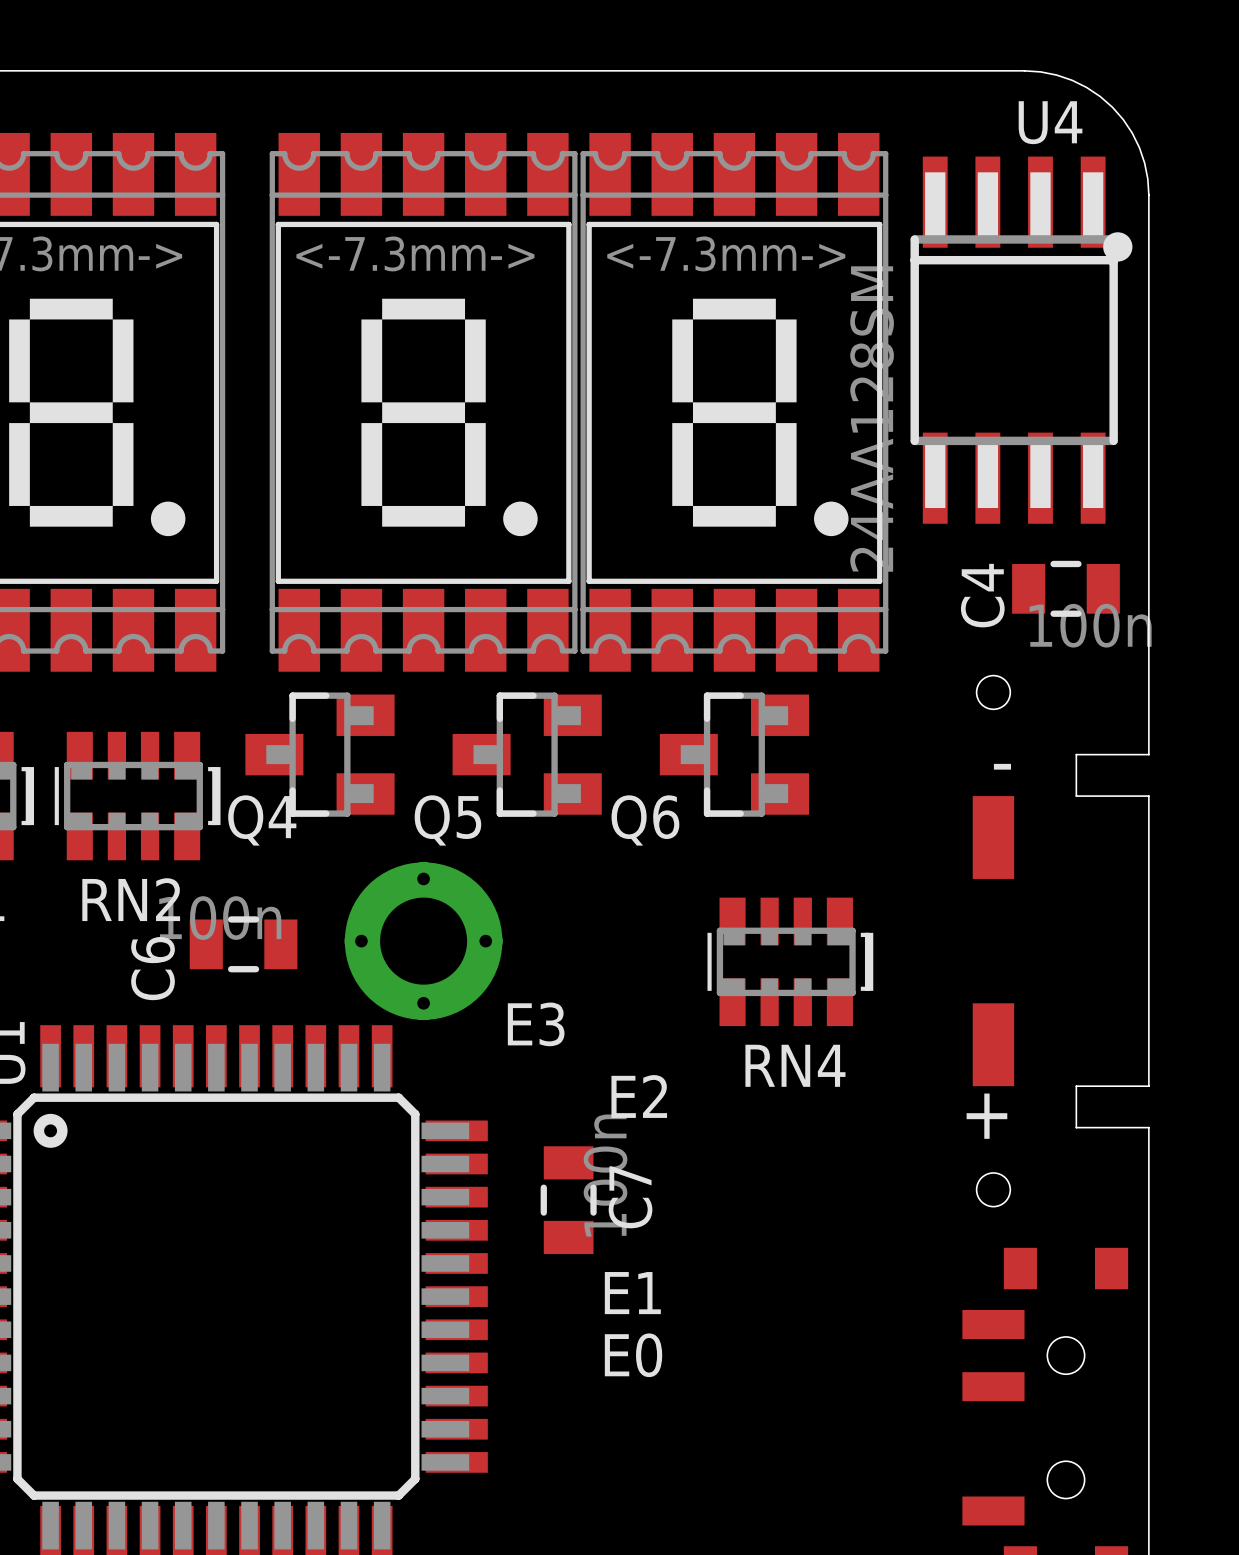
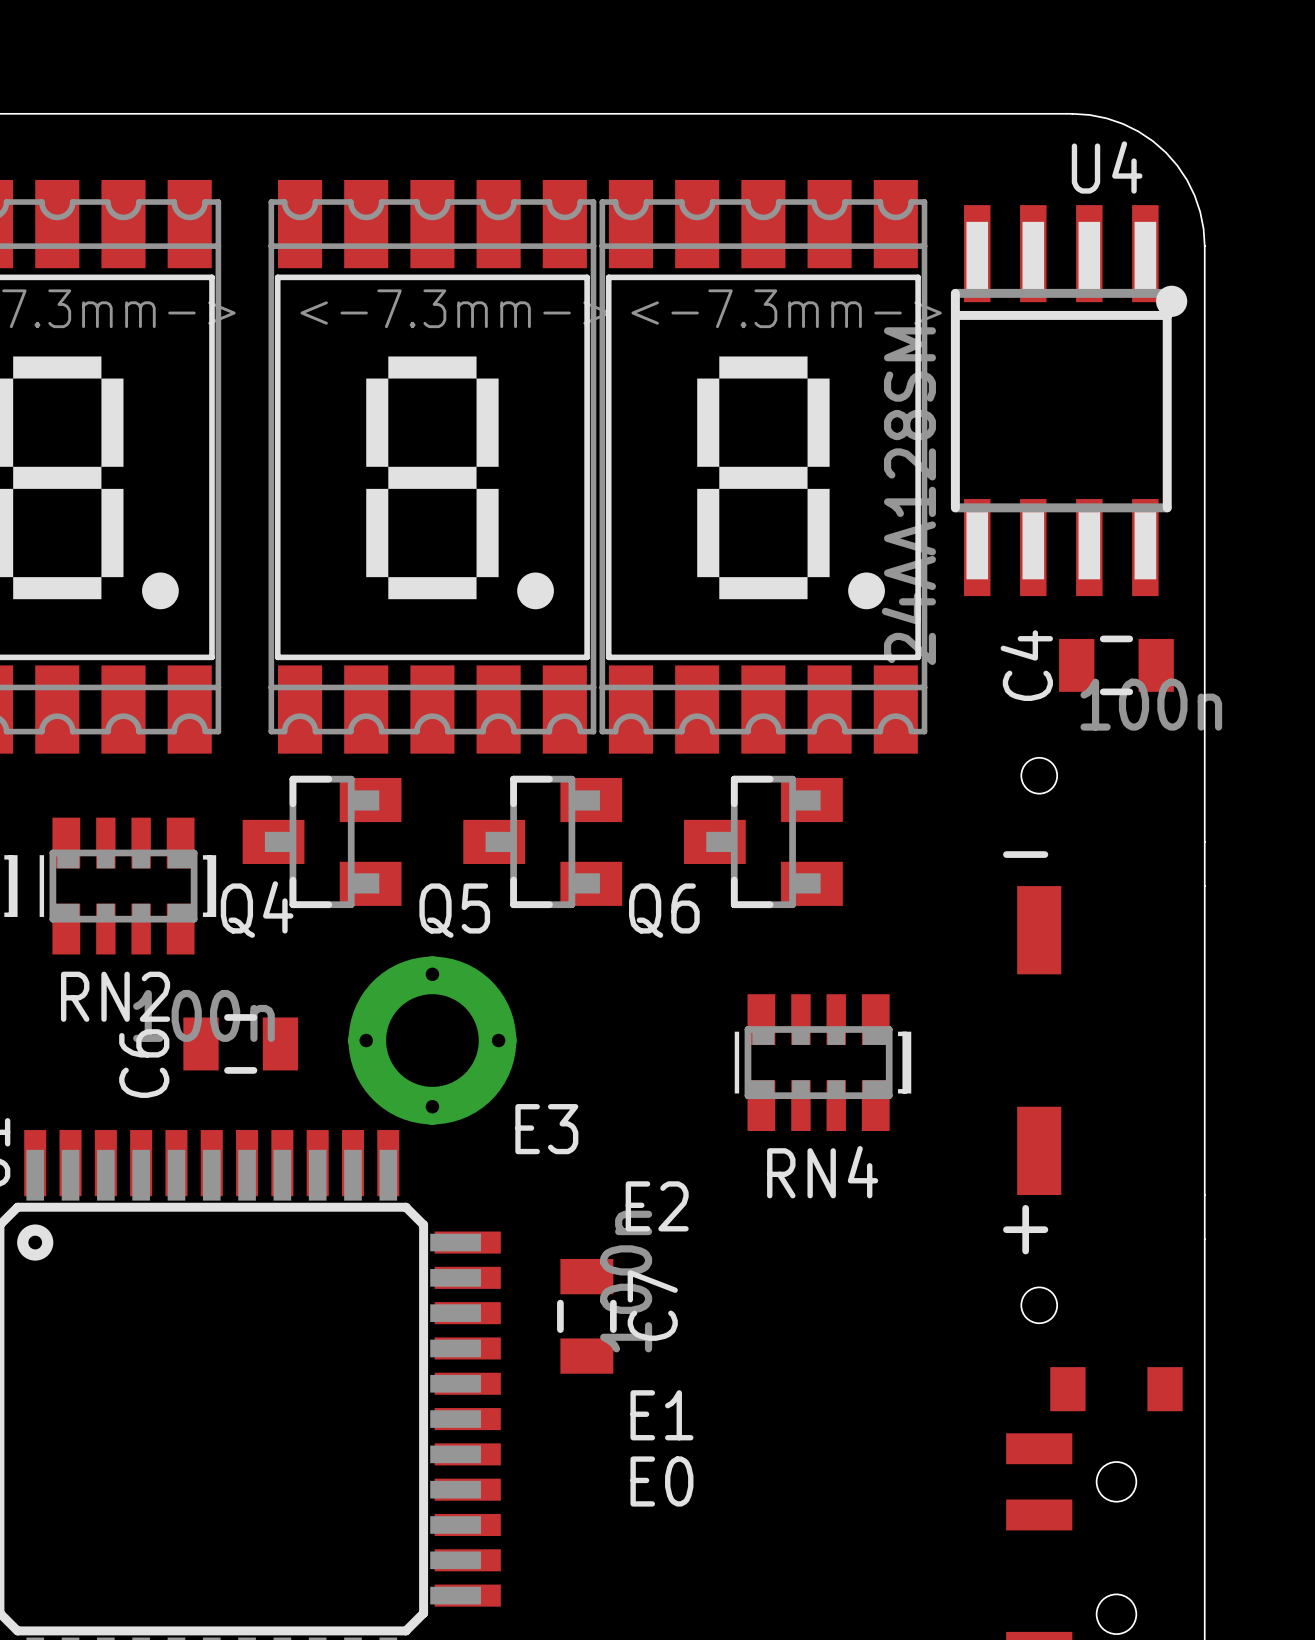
board edge: (1148, 754) (1076, 754) (1076, 796) (1148, 796) -> (1204, 841) (1204, 886)
board edge: (1148, 1086) (1076, 1086) (1076, 1127) (1148, 1127) -> (1204, 1194) (1204, 1239)

